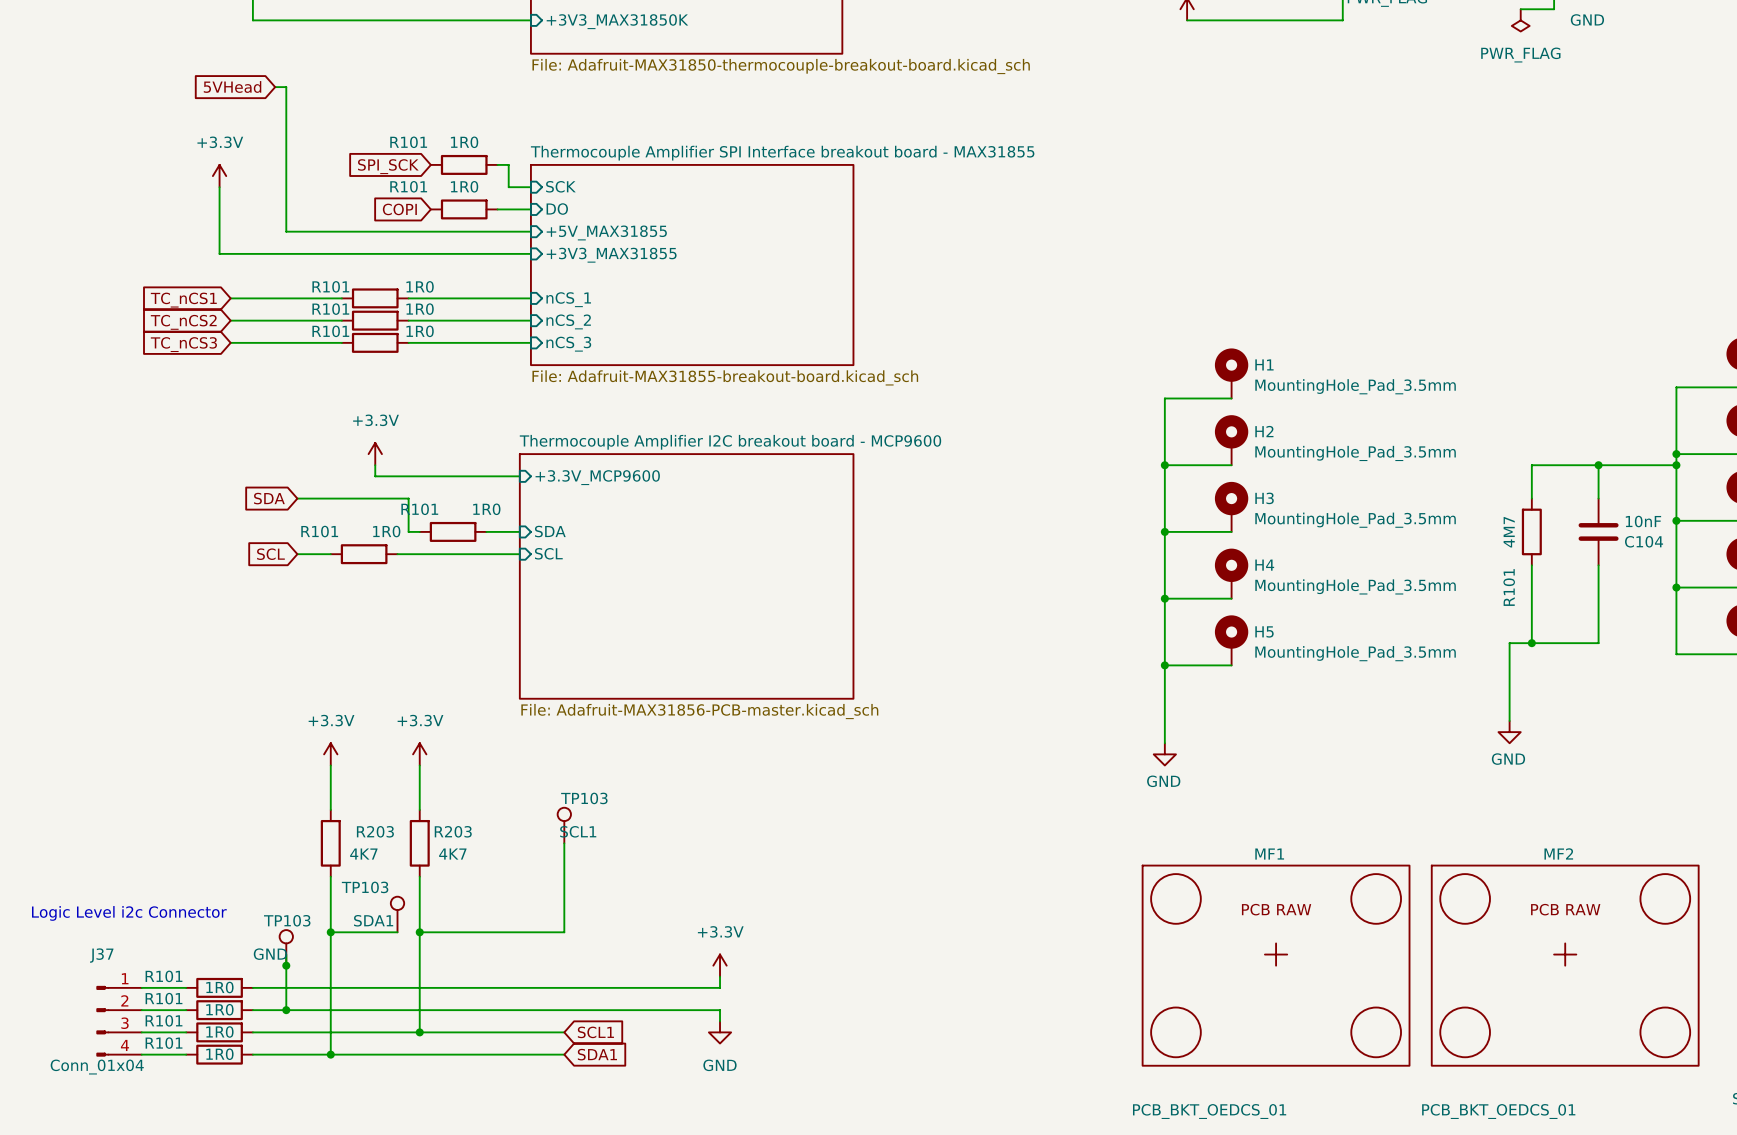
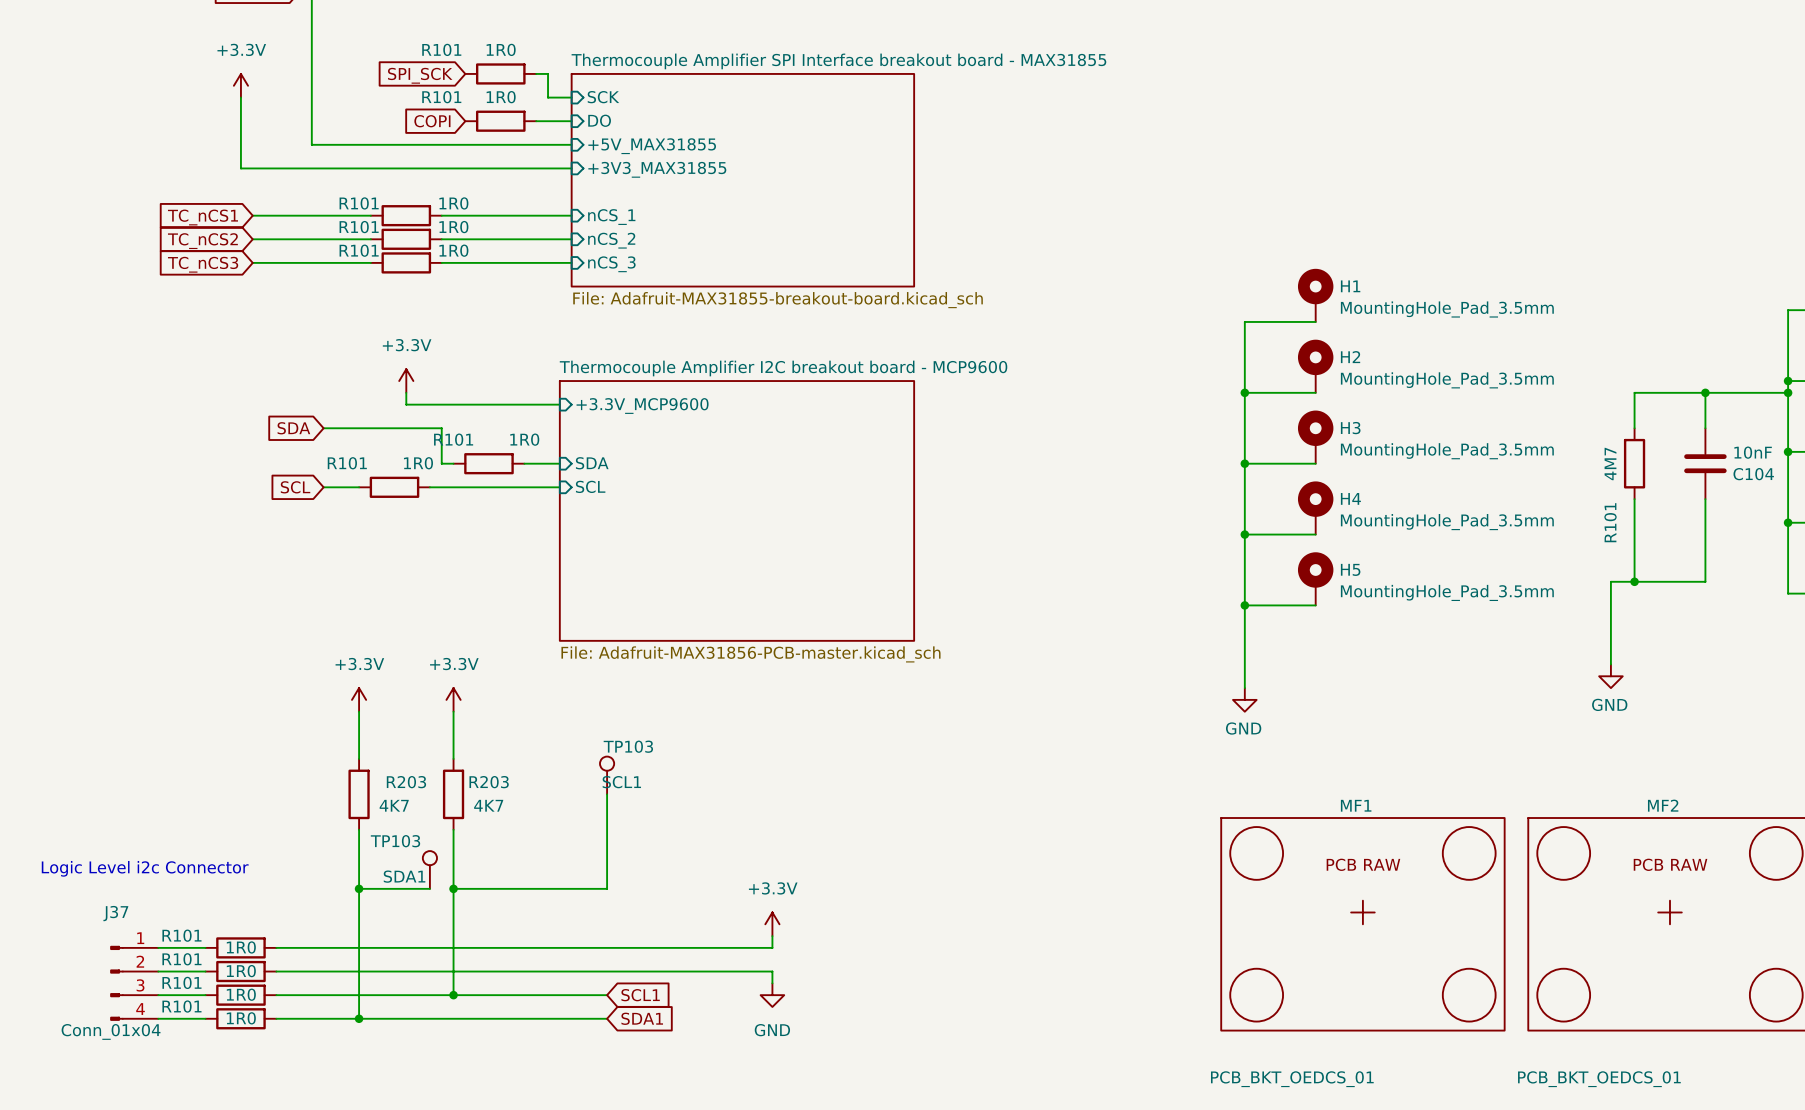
TP103: GND (286, 947) -> none
wire: (286, 954) (286, 1010) -> none
junction: (286, 965) -> none
junction: (286, 1010) -> none

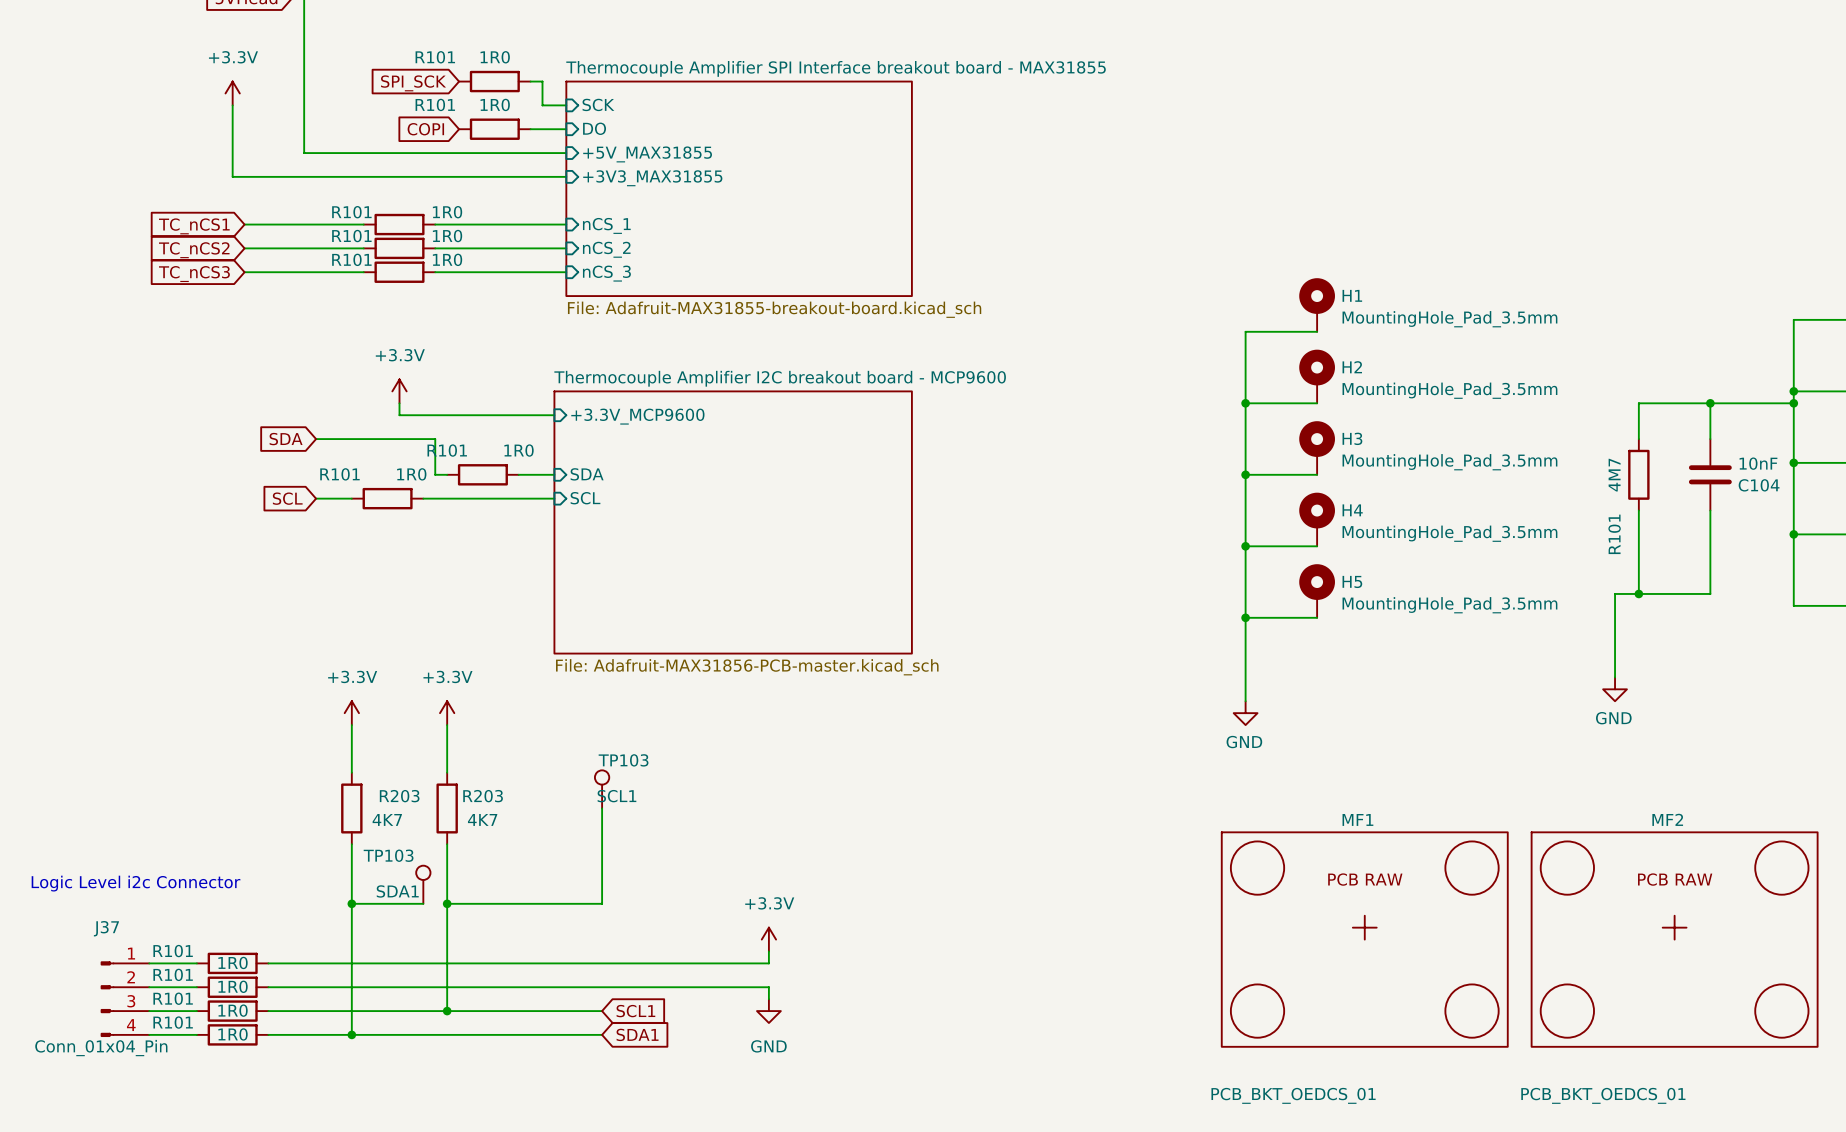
J37 value: Conn_01x04 (111, 1031) -> Conn_01x04_Pin (101, 1048)

